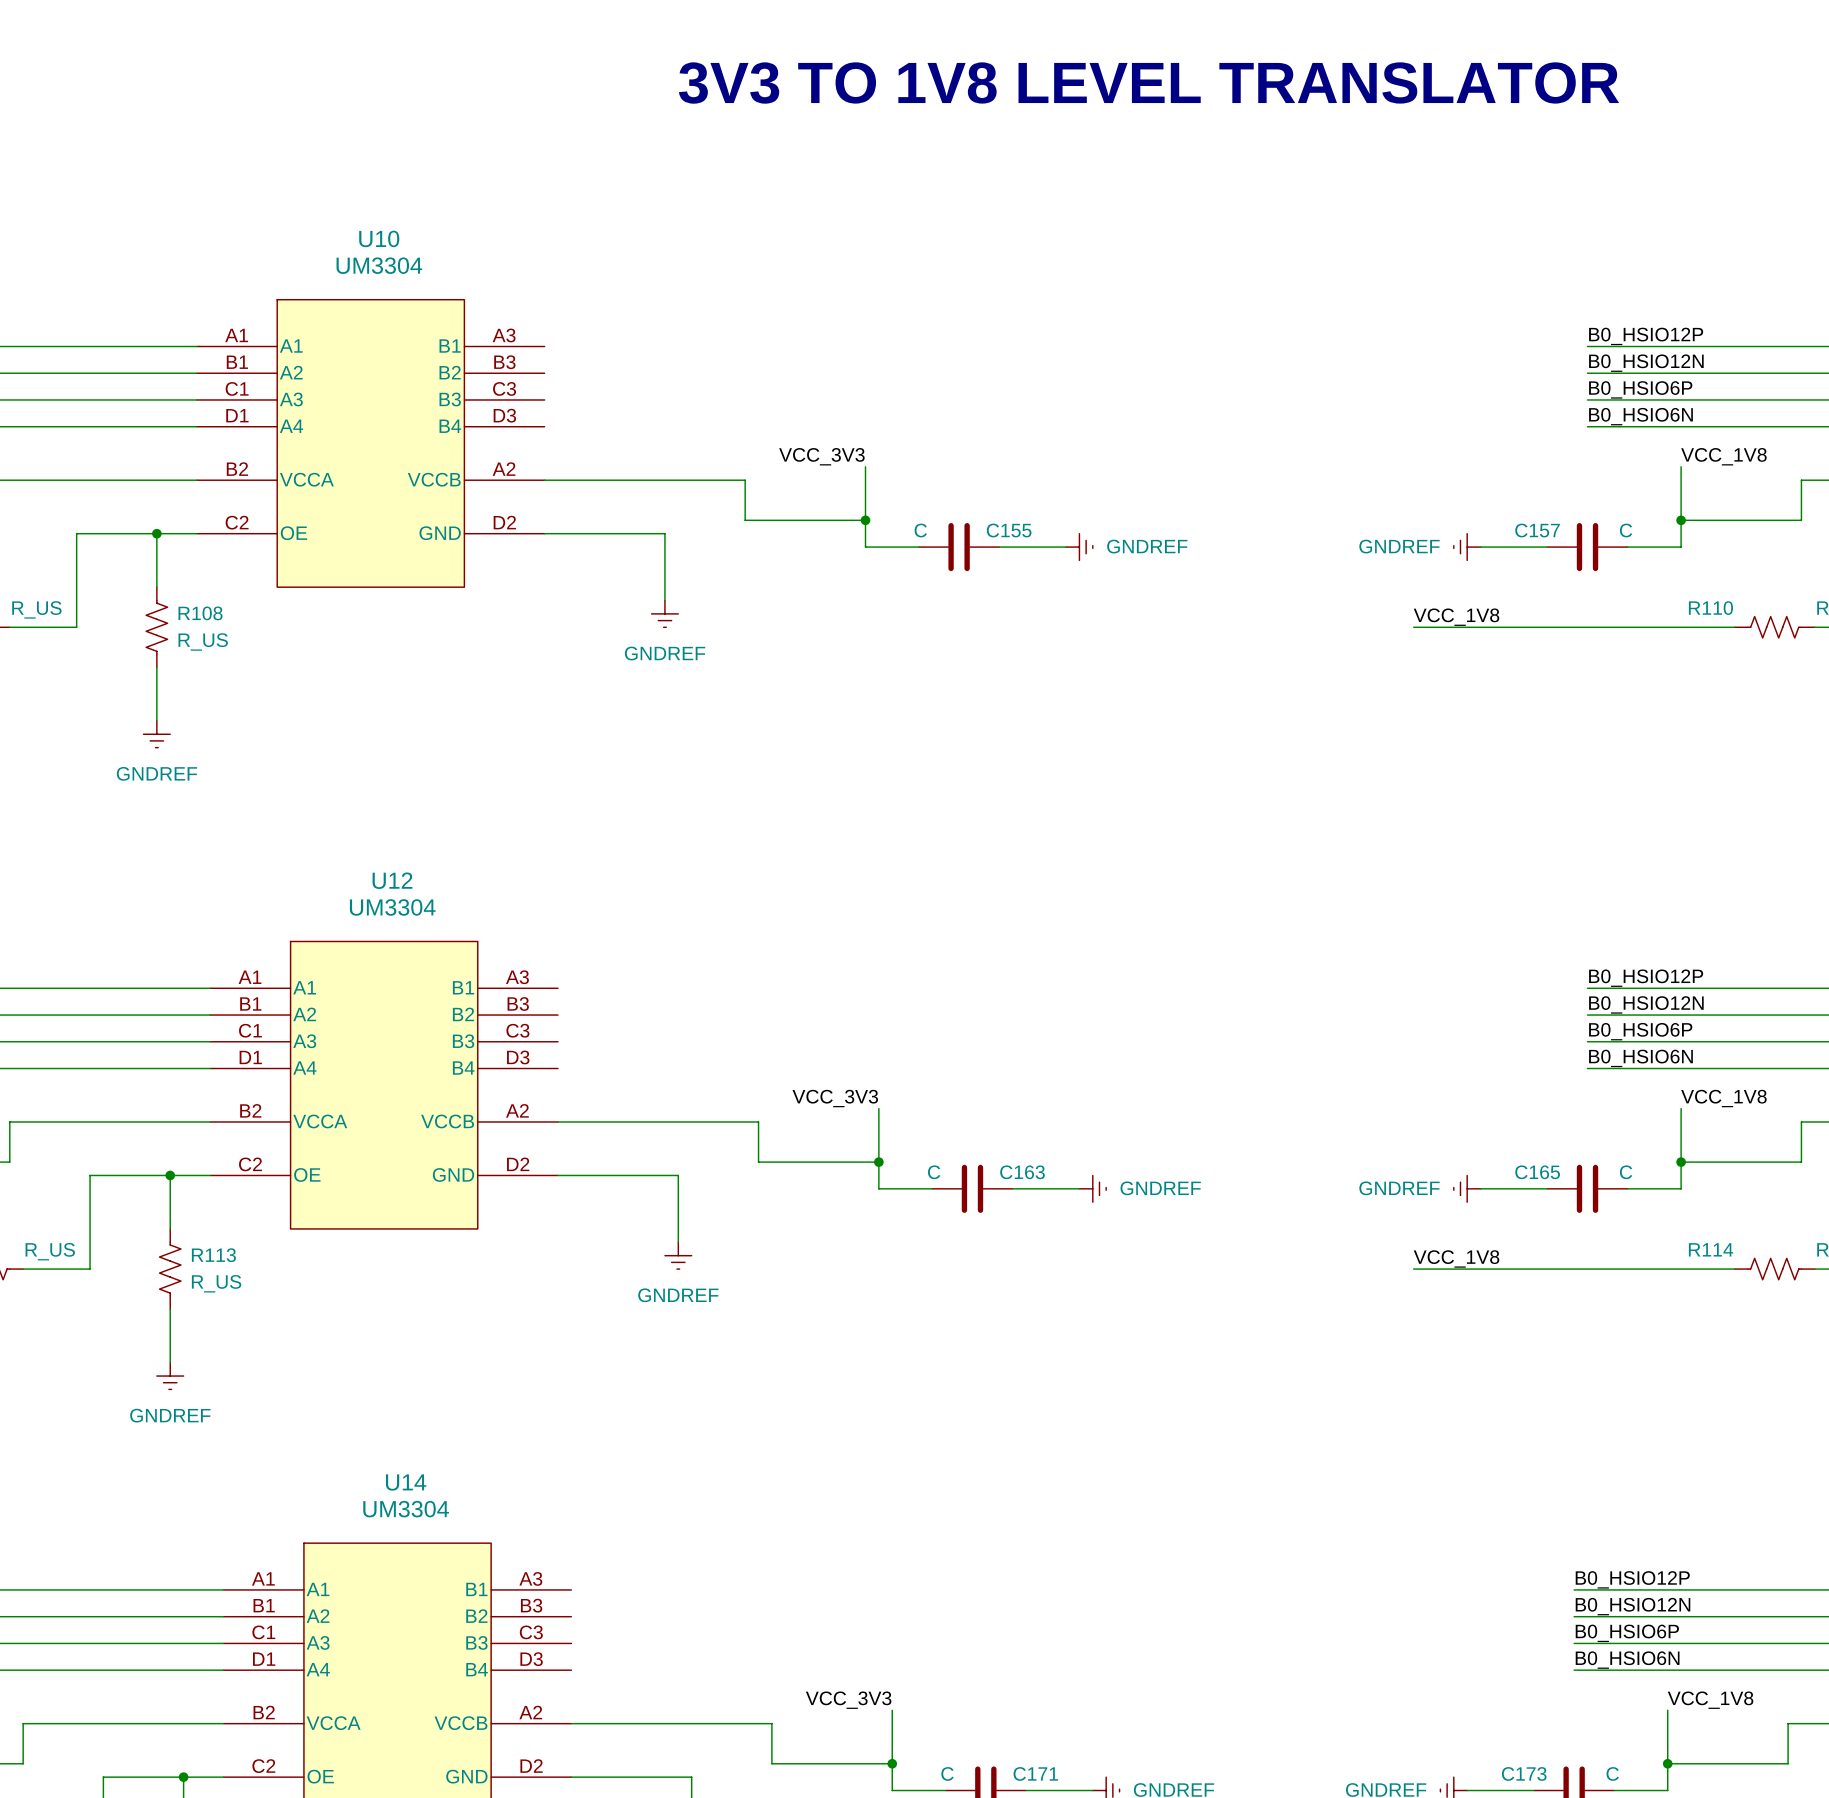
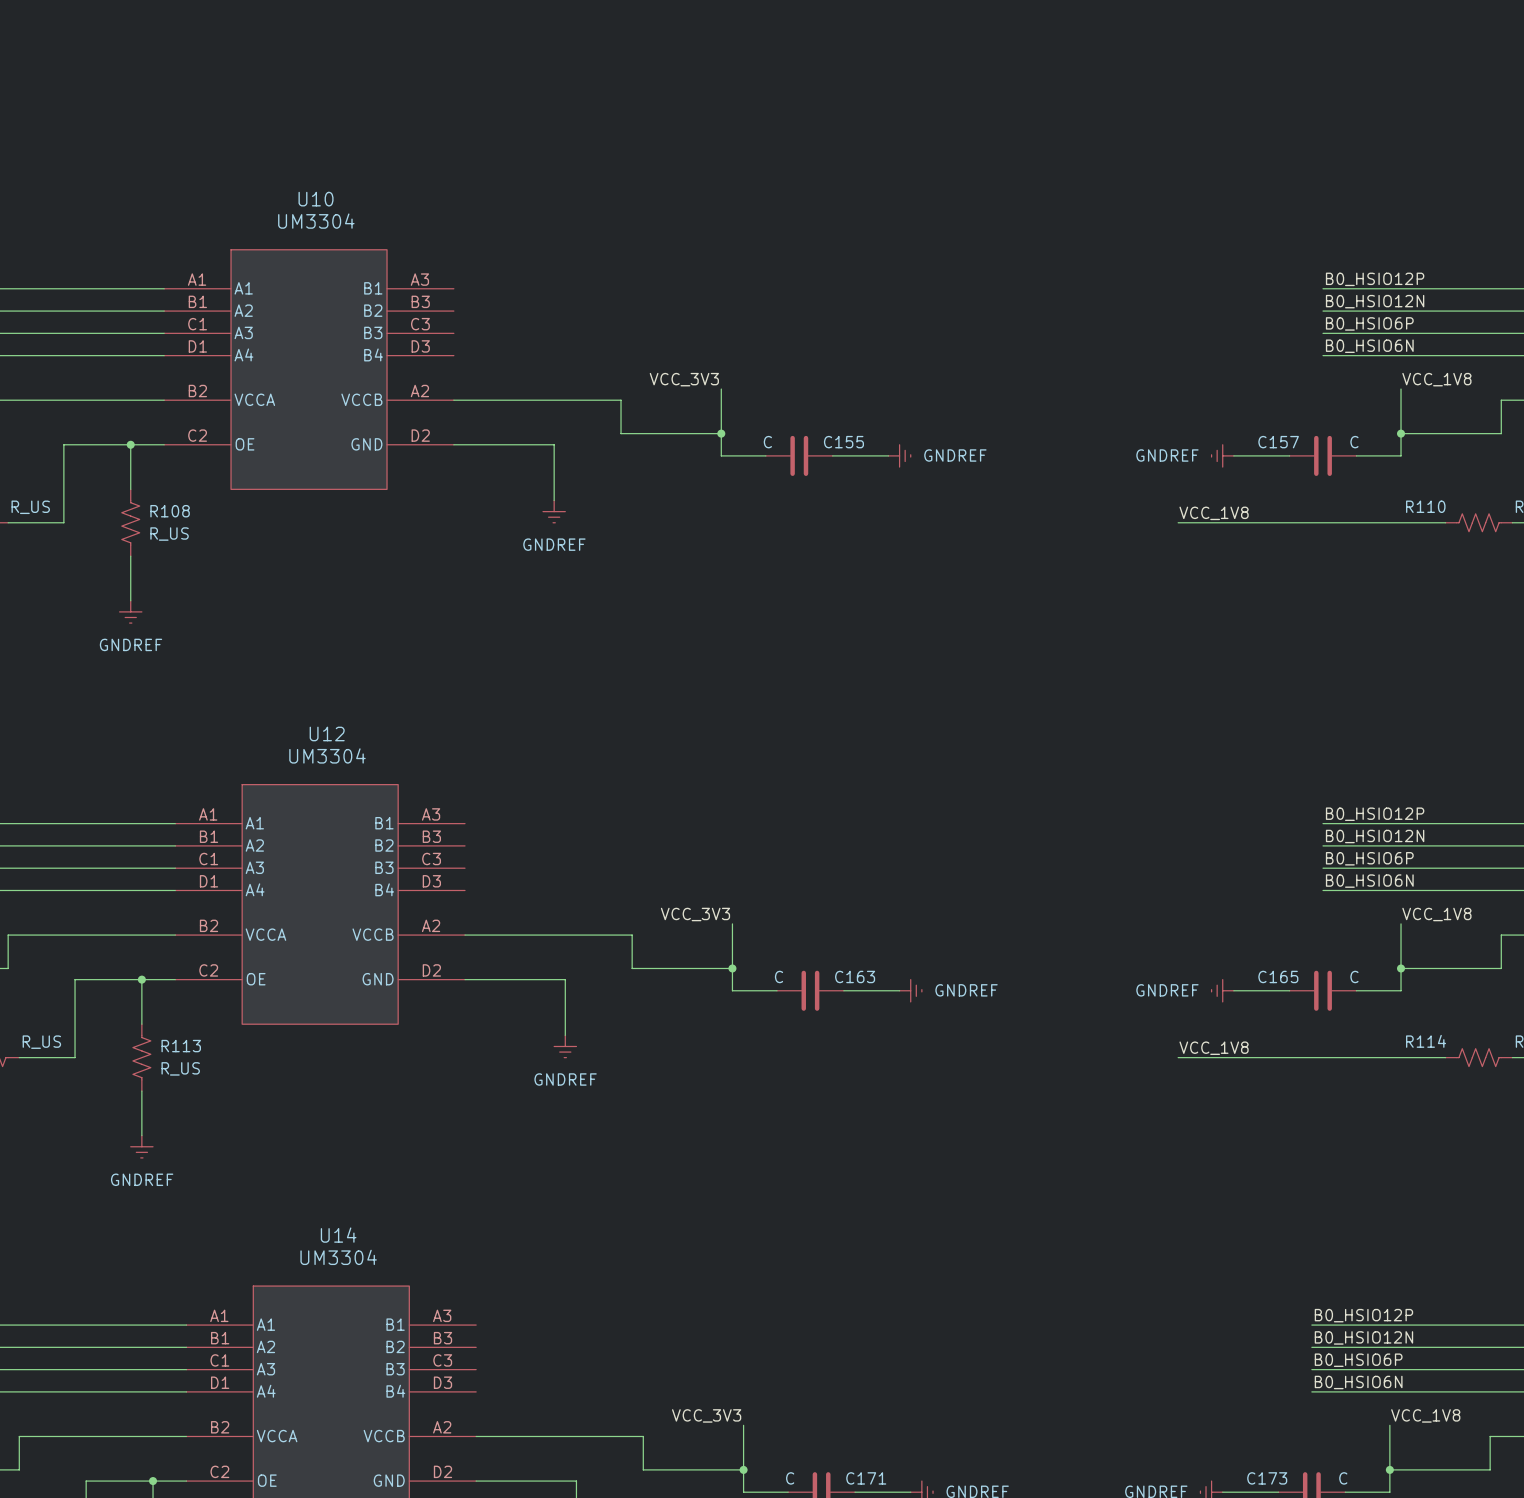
text: 3V3 TO 1V8 LEVEL TRANSLATOR (1149, 83) -> none

